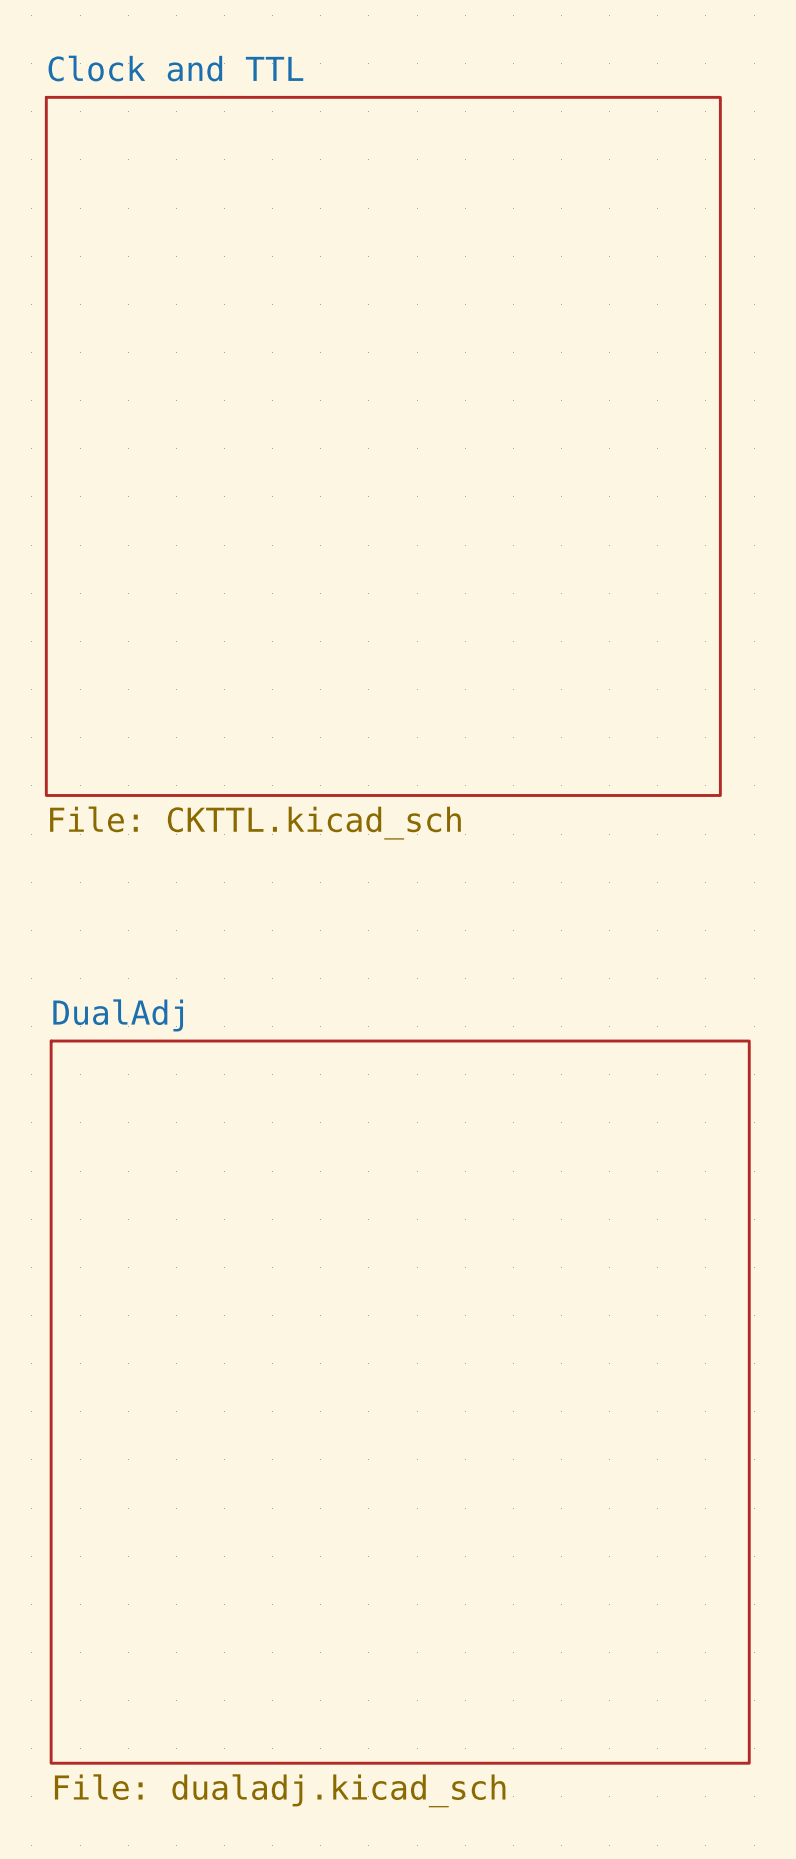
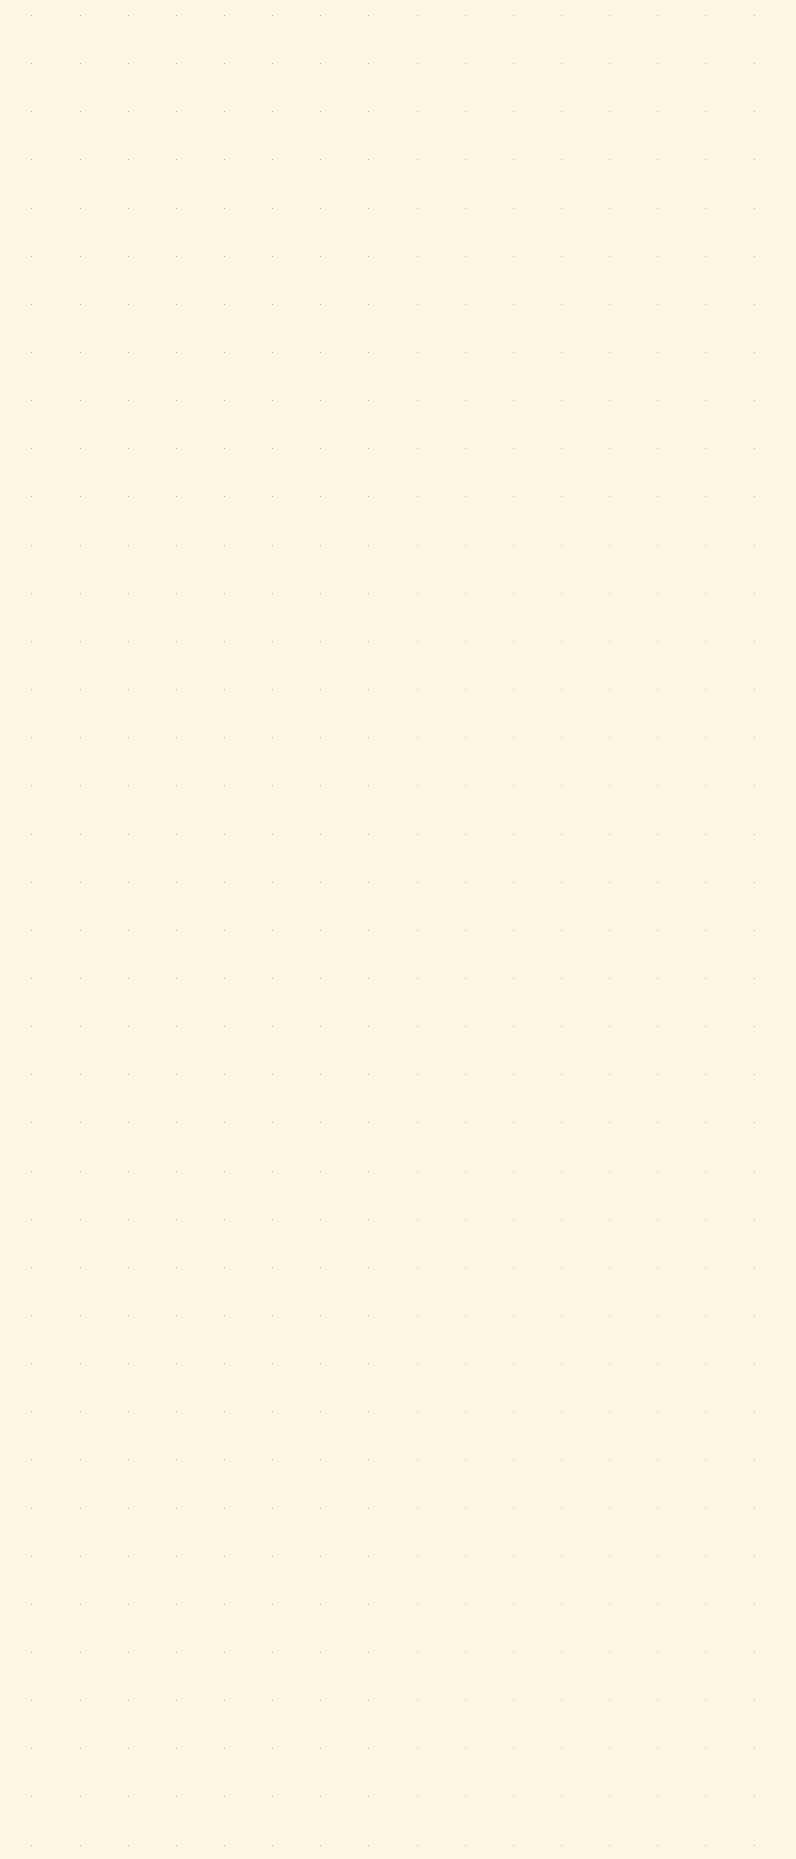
sheet Clock and TTL: File: CKTTL.kicad_sch (383, 446) -> none
sheet DualAdj: File: dualadj.kicad_sch (400, 1402) -> none

